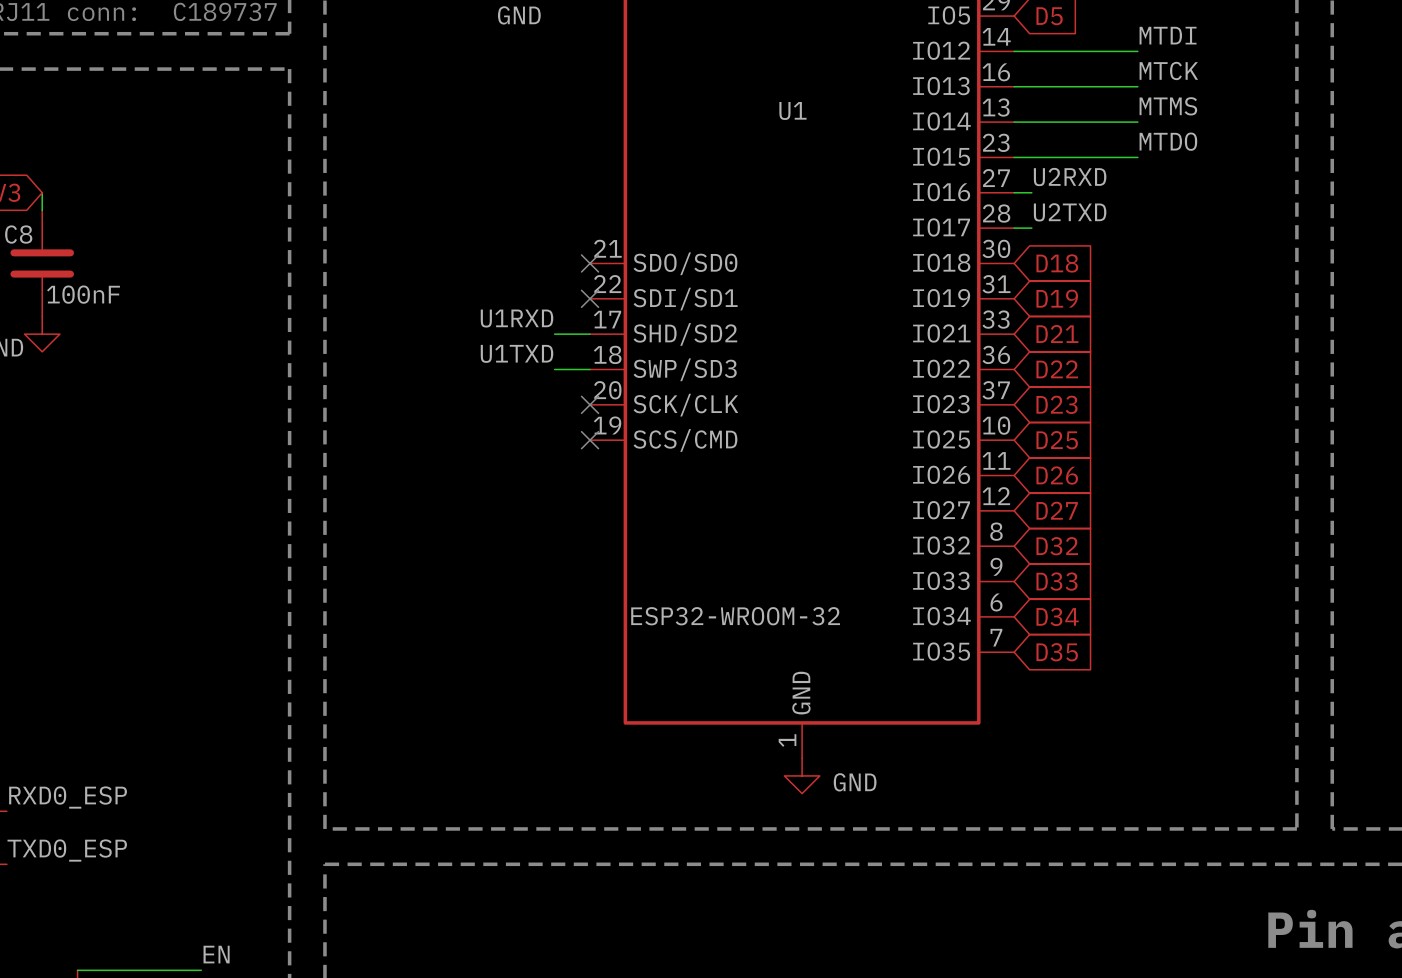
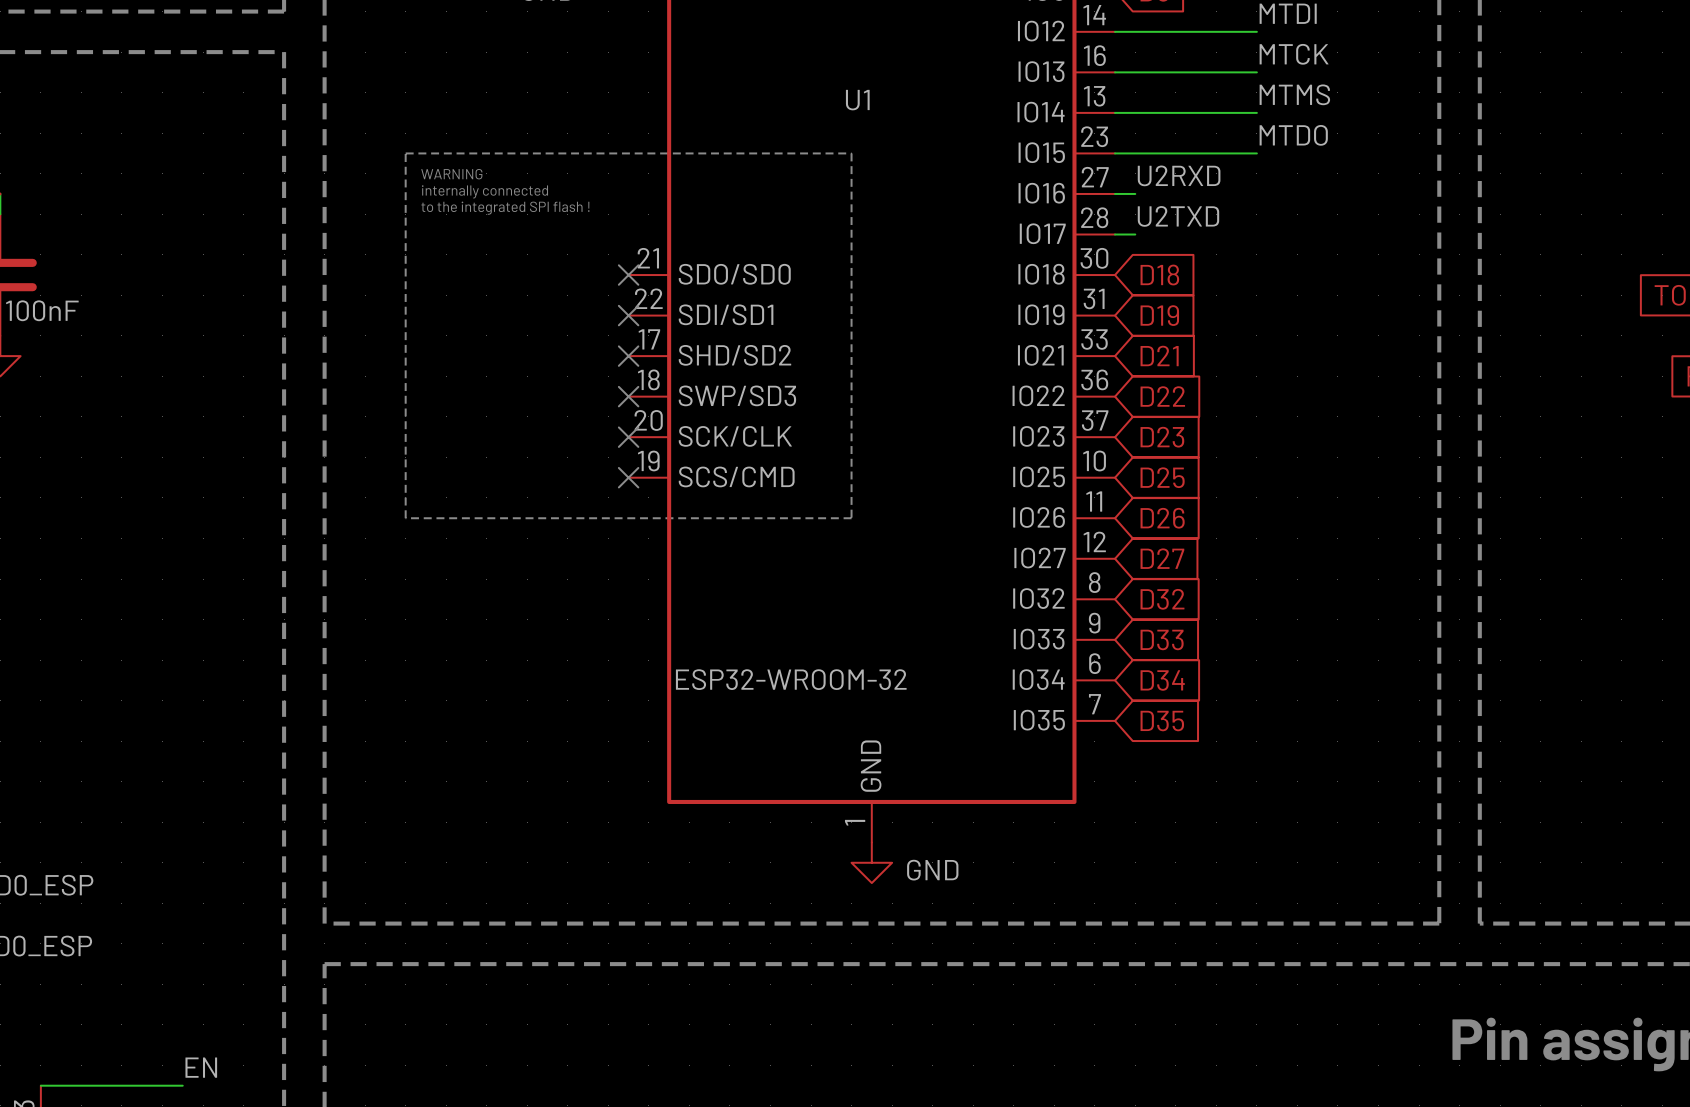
line: none -> (405, 153) (851, 153) (851, 518) (405, 518) (405, 153)
text: none -> WARNING (451, 174)
text: none -> internally connected (484, 191)
text: none -> to the integrated SPI flash ! (505, 208)
label: U1RXD (517, 318) -> none
wire: (554, 334) (590, 334) -> none
no-connect mark: none -> (628, 356)
label: U1TXD (517, 353) -> none
wire: (554, 369) (590, 369) -> none
no-connect mark: none -> (628, 396)

